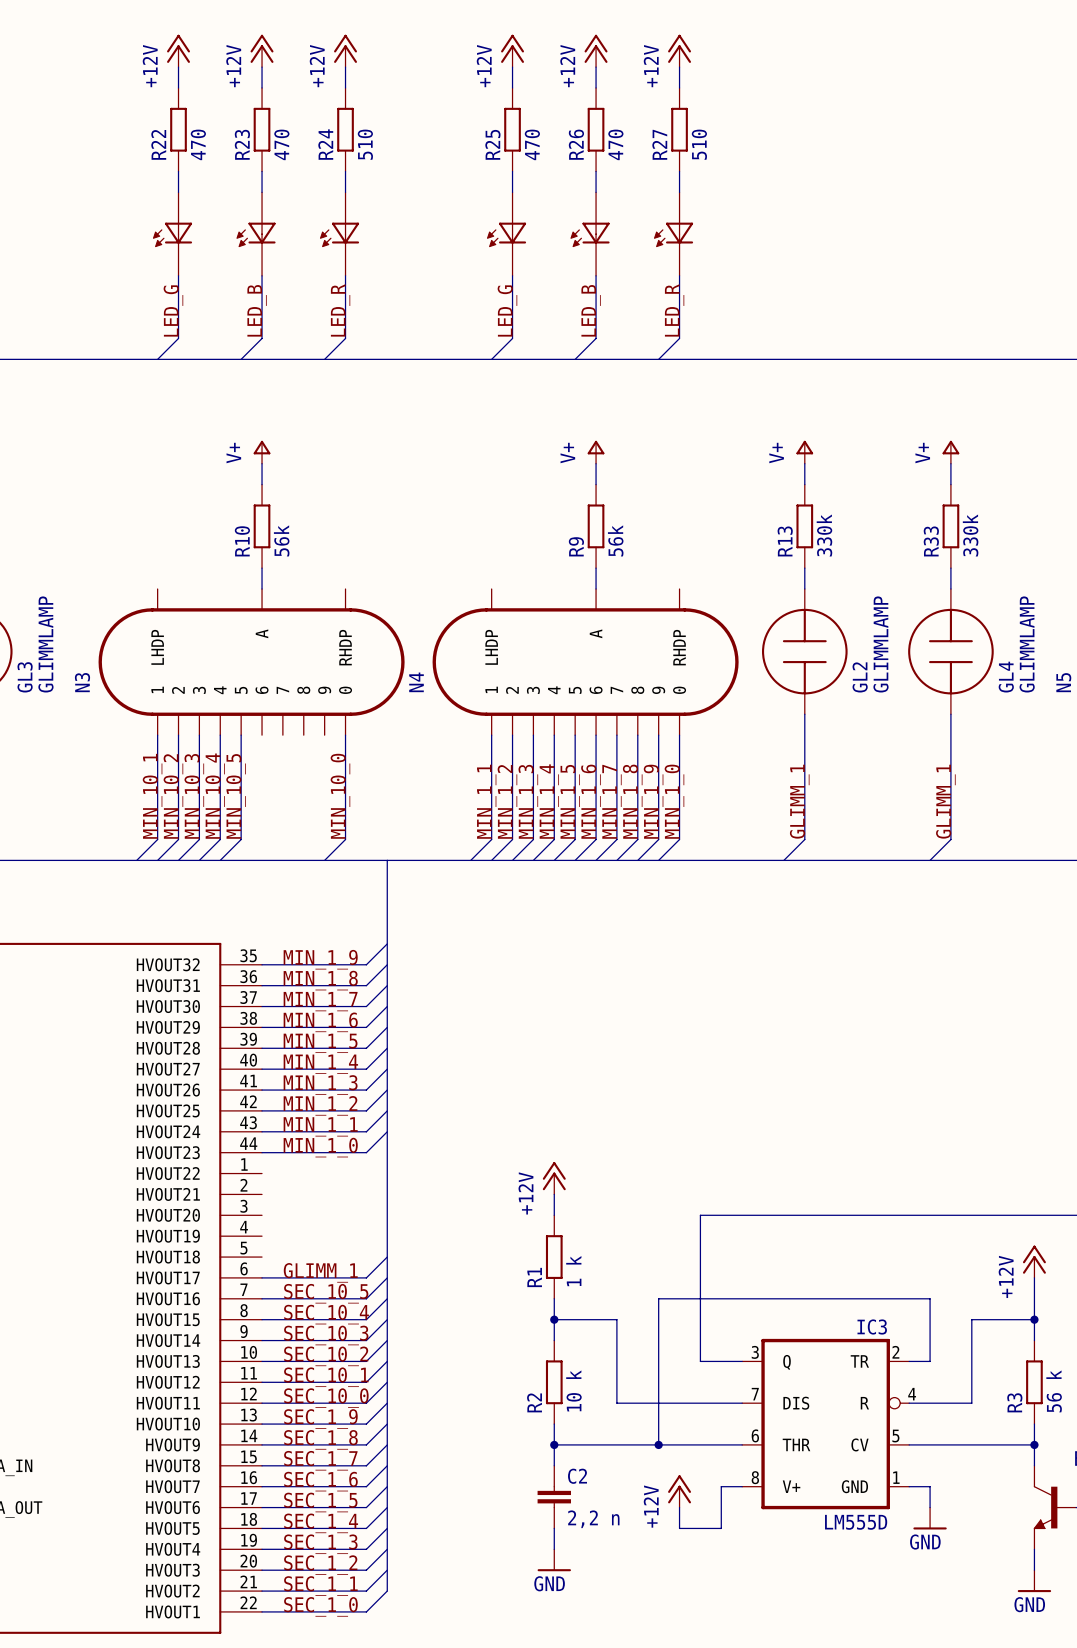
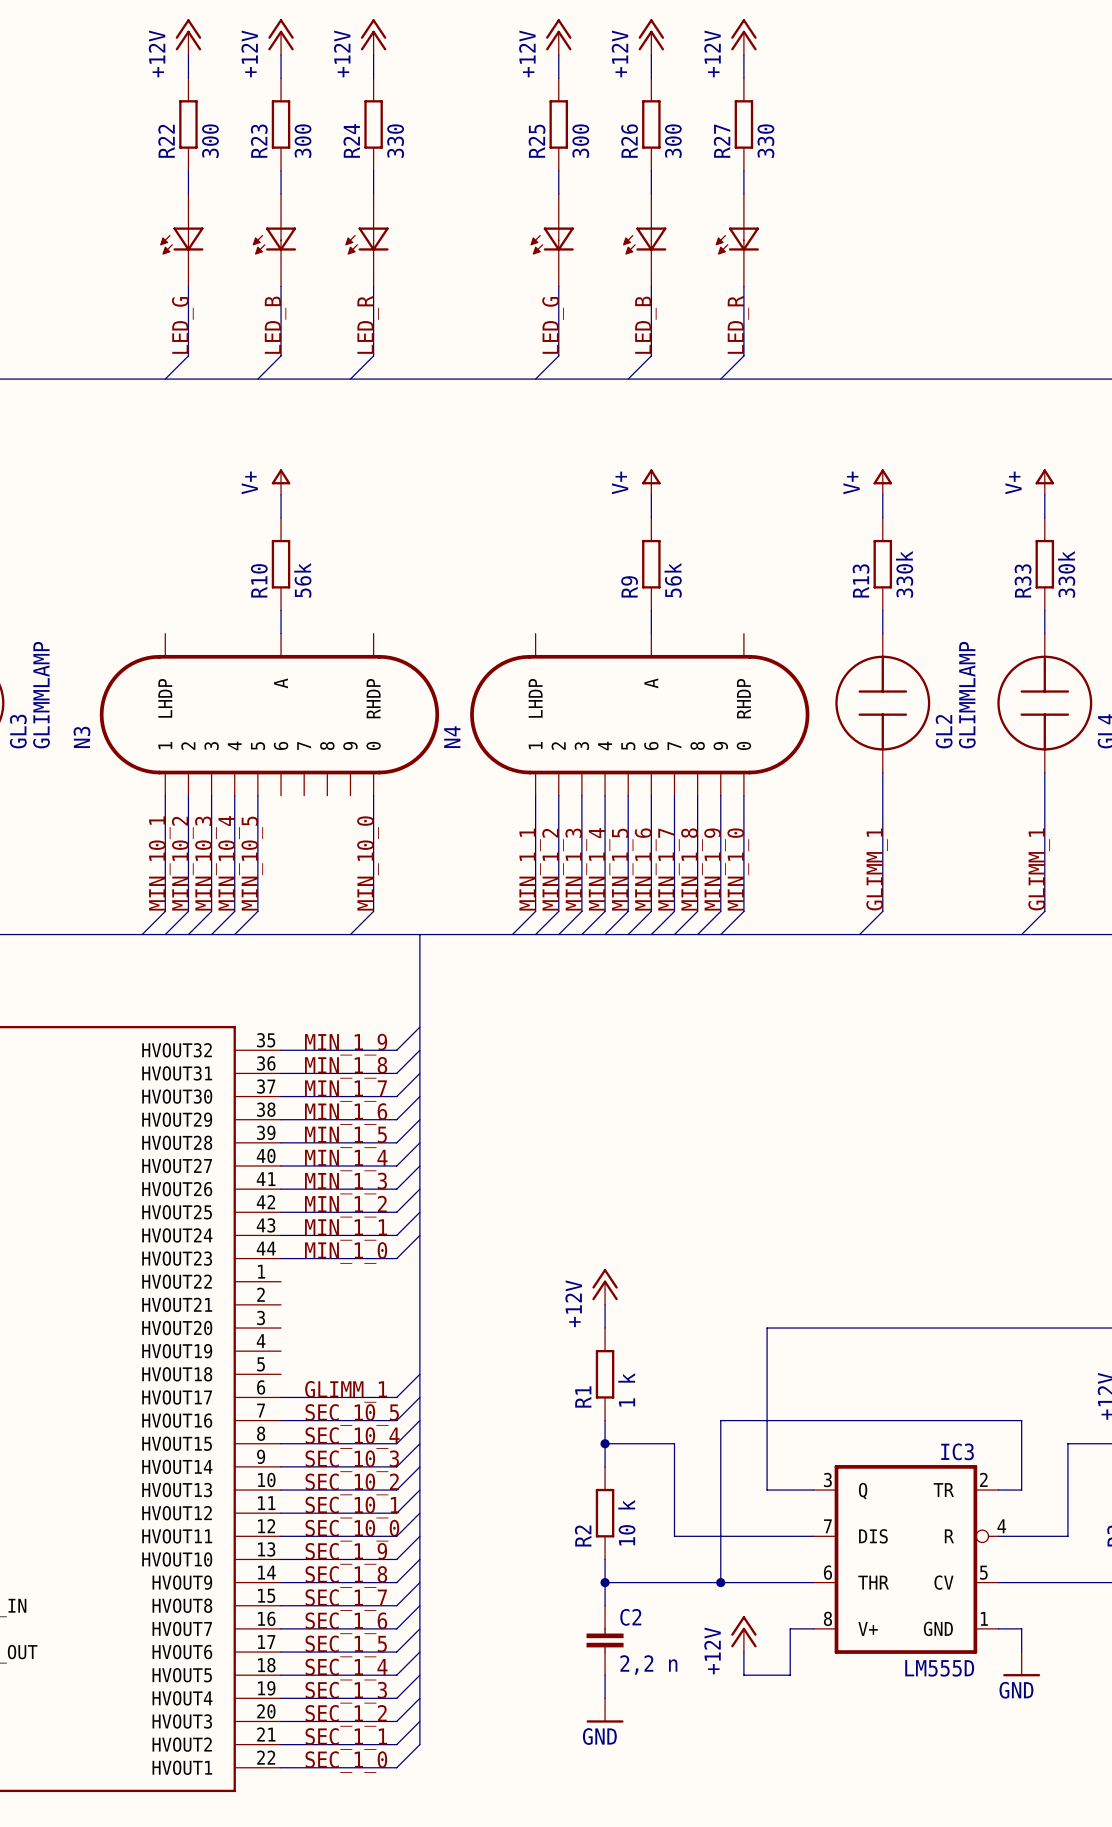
R22 value: 470 (198, 144) -> 300 (210, 141)
R23 value: 470 (281, 144) -> 300 (303, 141)
R24 value: 510 (365, 144) -> 330 (395, 141)
R25 value: 470 (532, 144) -> 300 (580, 141)
R26 value: 470 (615, 144) -> 300 (673, 141)
R27 value: 510 (699, 144) -> 330 (765, 141)

